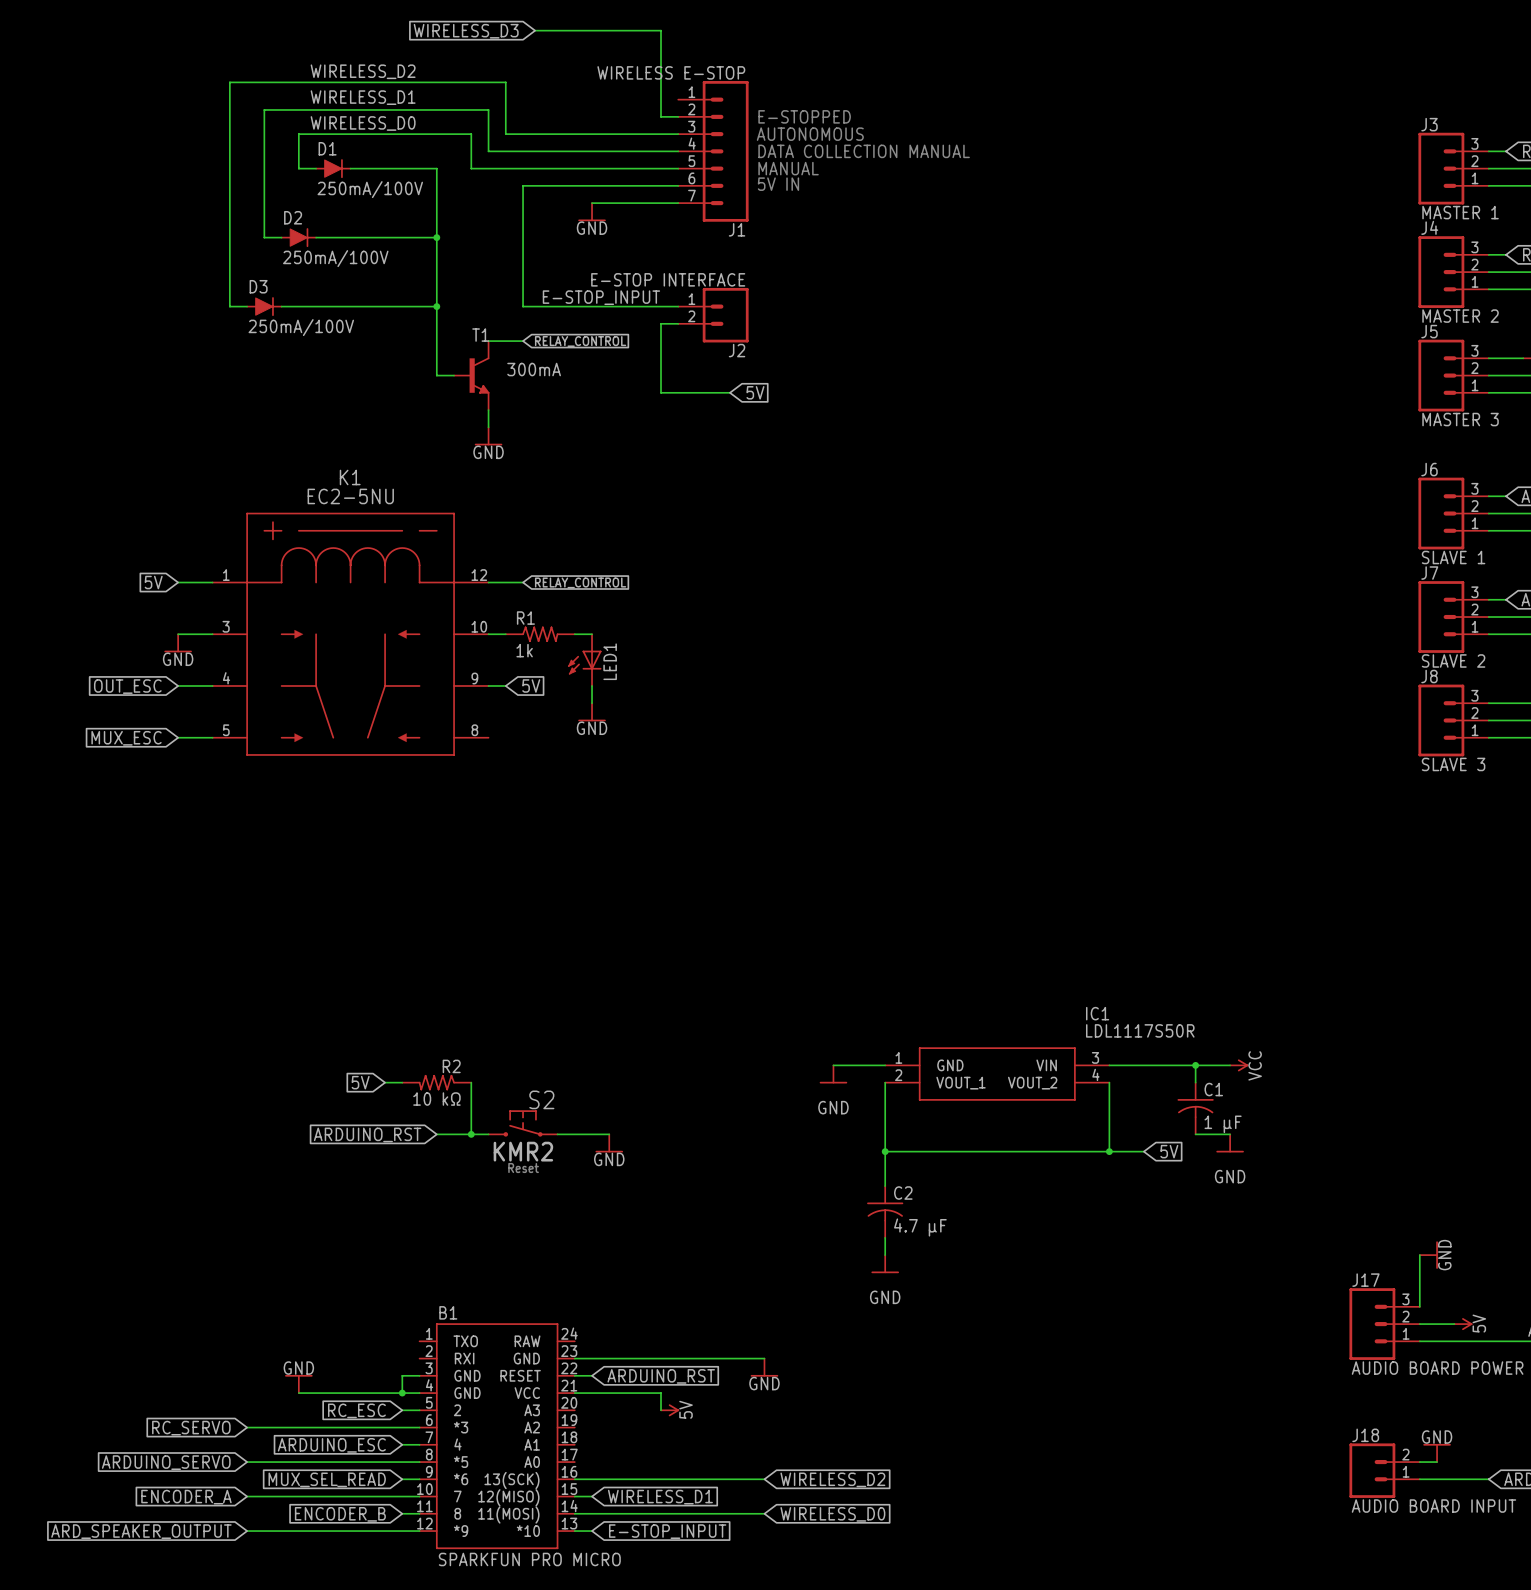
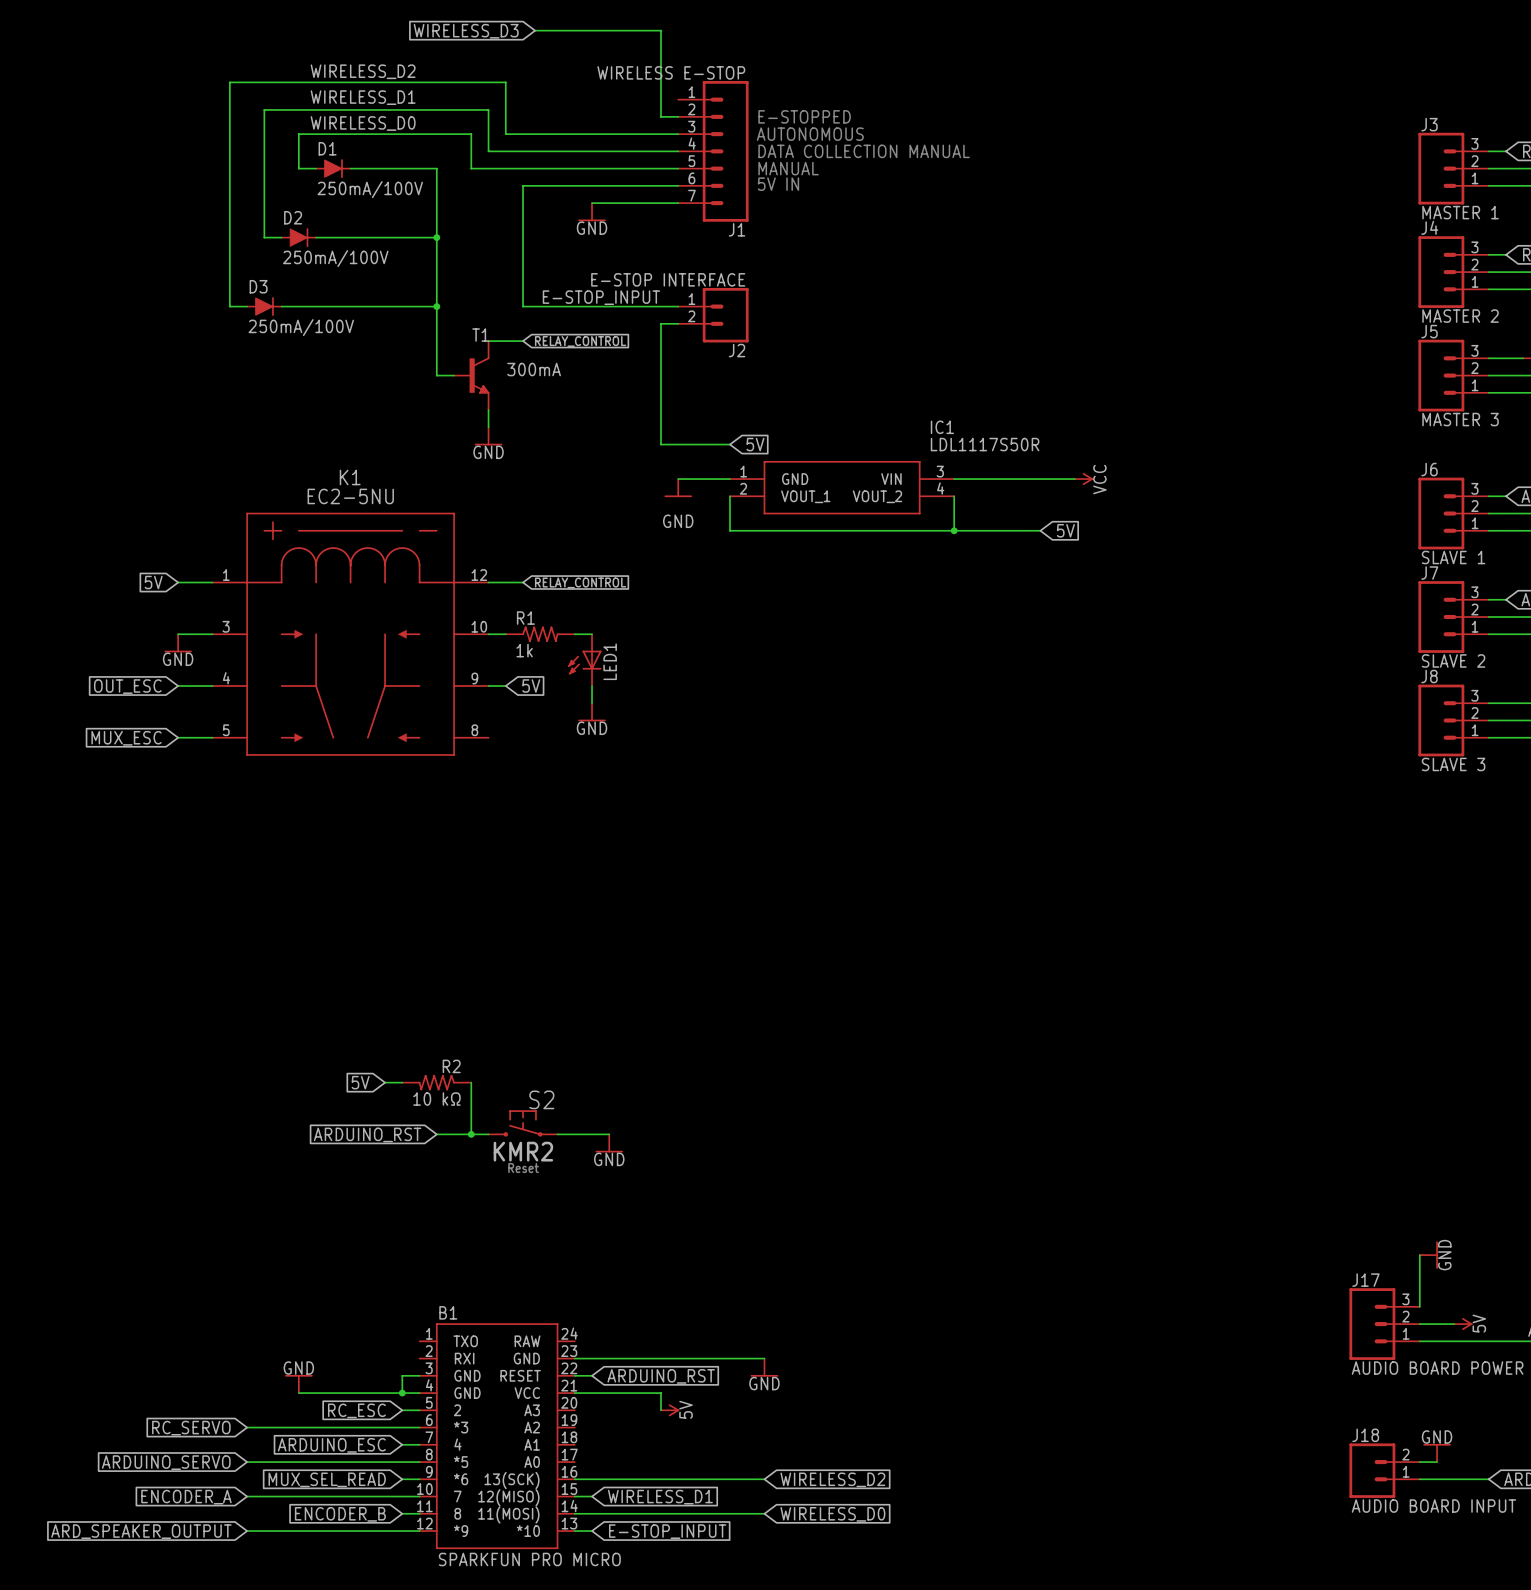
wire: (661, 392) (729, 392) -> (661, 392) (661, 444) (729, 444)
global label position: 5V (755, 392) -> 5V (755, 444)
wire: none -> (678, 479) (729, 479)
wire: none -> (954, 479) (1074, 479)
power symbol: none -> VCC (1083, 479)
power symbol: none -> GND (678, 488)
wire: none -> (729, 496) (729, 530) (1040, 530)
wire: none -> (954, 496) (954, 530)
junction: none -> (954, 530)
global label: none -> 5V (1065, 530)
wire: (833, 1065) (885, 1065) -> none
wire: (1109, 1065) (1230, 1065) -> none
wire: (1195, 1065) (1195, 1082) -> none
junction: (1195, 1065) -> none
power symbol: VCC (1239, 1065) -> none
power symbol: GND (833, 1074) -> none
IC1 position: (997, 1074) -> (842, 487)
wire: (885, 1082) (885, 1186) -> none
wire: (1109, 1082) (1109, 1151) -> none
C1: 1 µF (1195, 1108) -> none
wire: (1195, 1134) (1230, 1134) -> none
power symbol: GND (1230, 1143) -> none
wire: (885, 1151) (1143, 1151) -> none
junction: (885, 1151) -> none
junction: (1109, 1151) -> none
global label: 5V (1169, 1151) -> none
C2: 4.7 µF (885, 1211) -> none
wire: (885, 1237) (885, 1255) -> none
power symbol: GND (885, 1264) -> none

